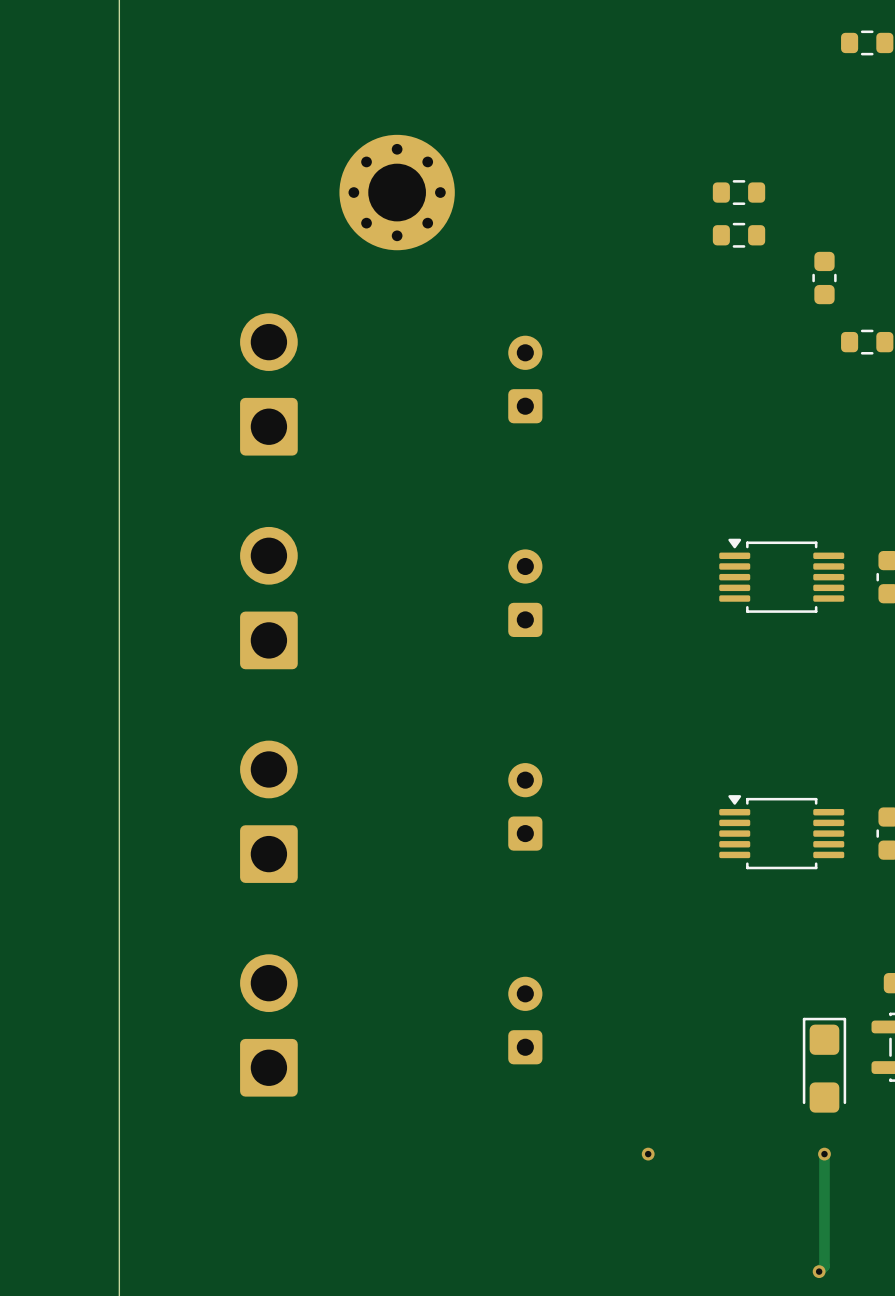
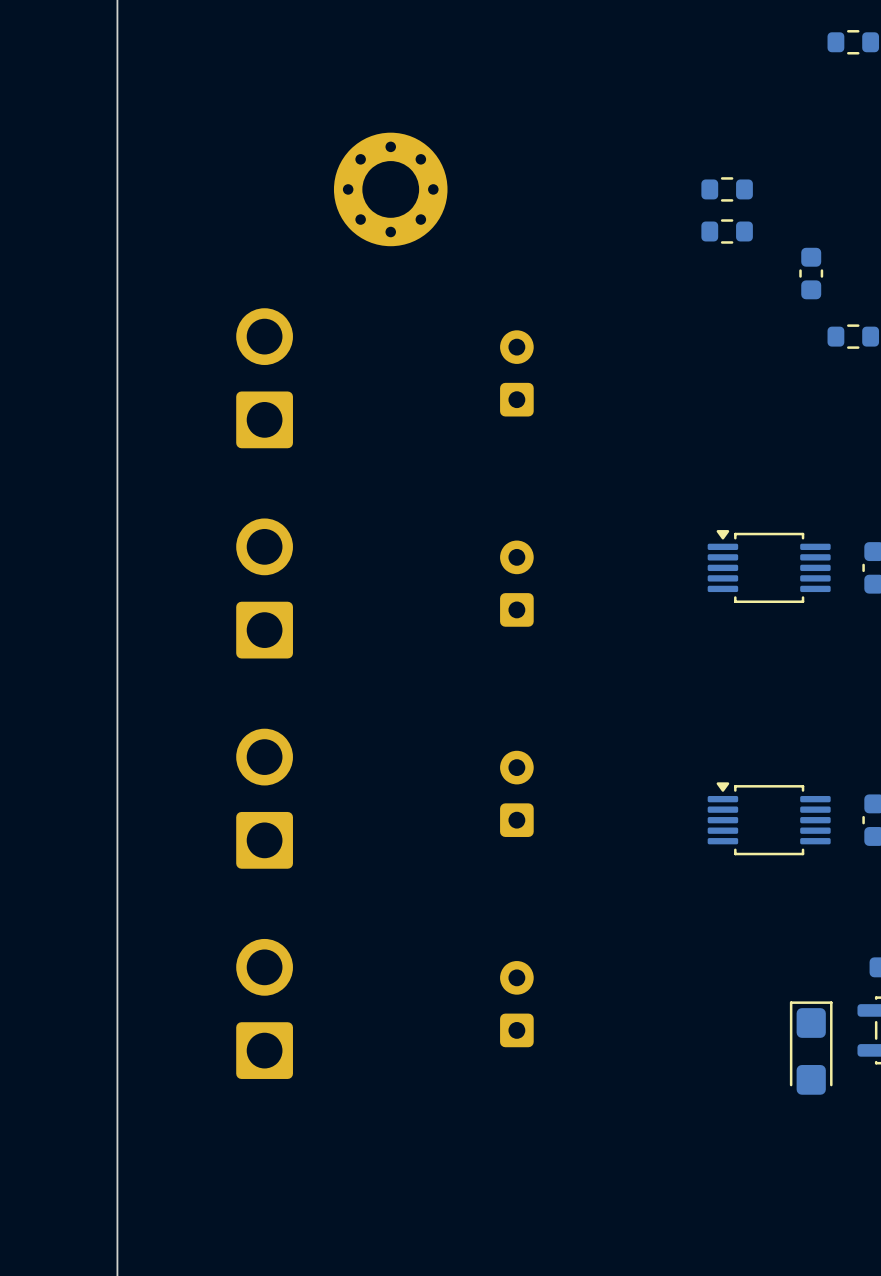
via: (648, 1154) -> none
track: (824, 1154) (824, 1266) (819, 1271) -> none
via: (824, 1154) -> none
via: (819, 1271) -> none

